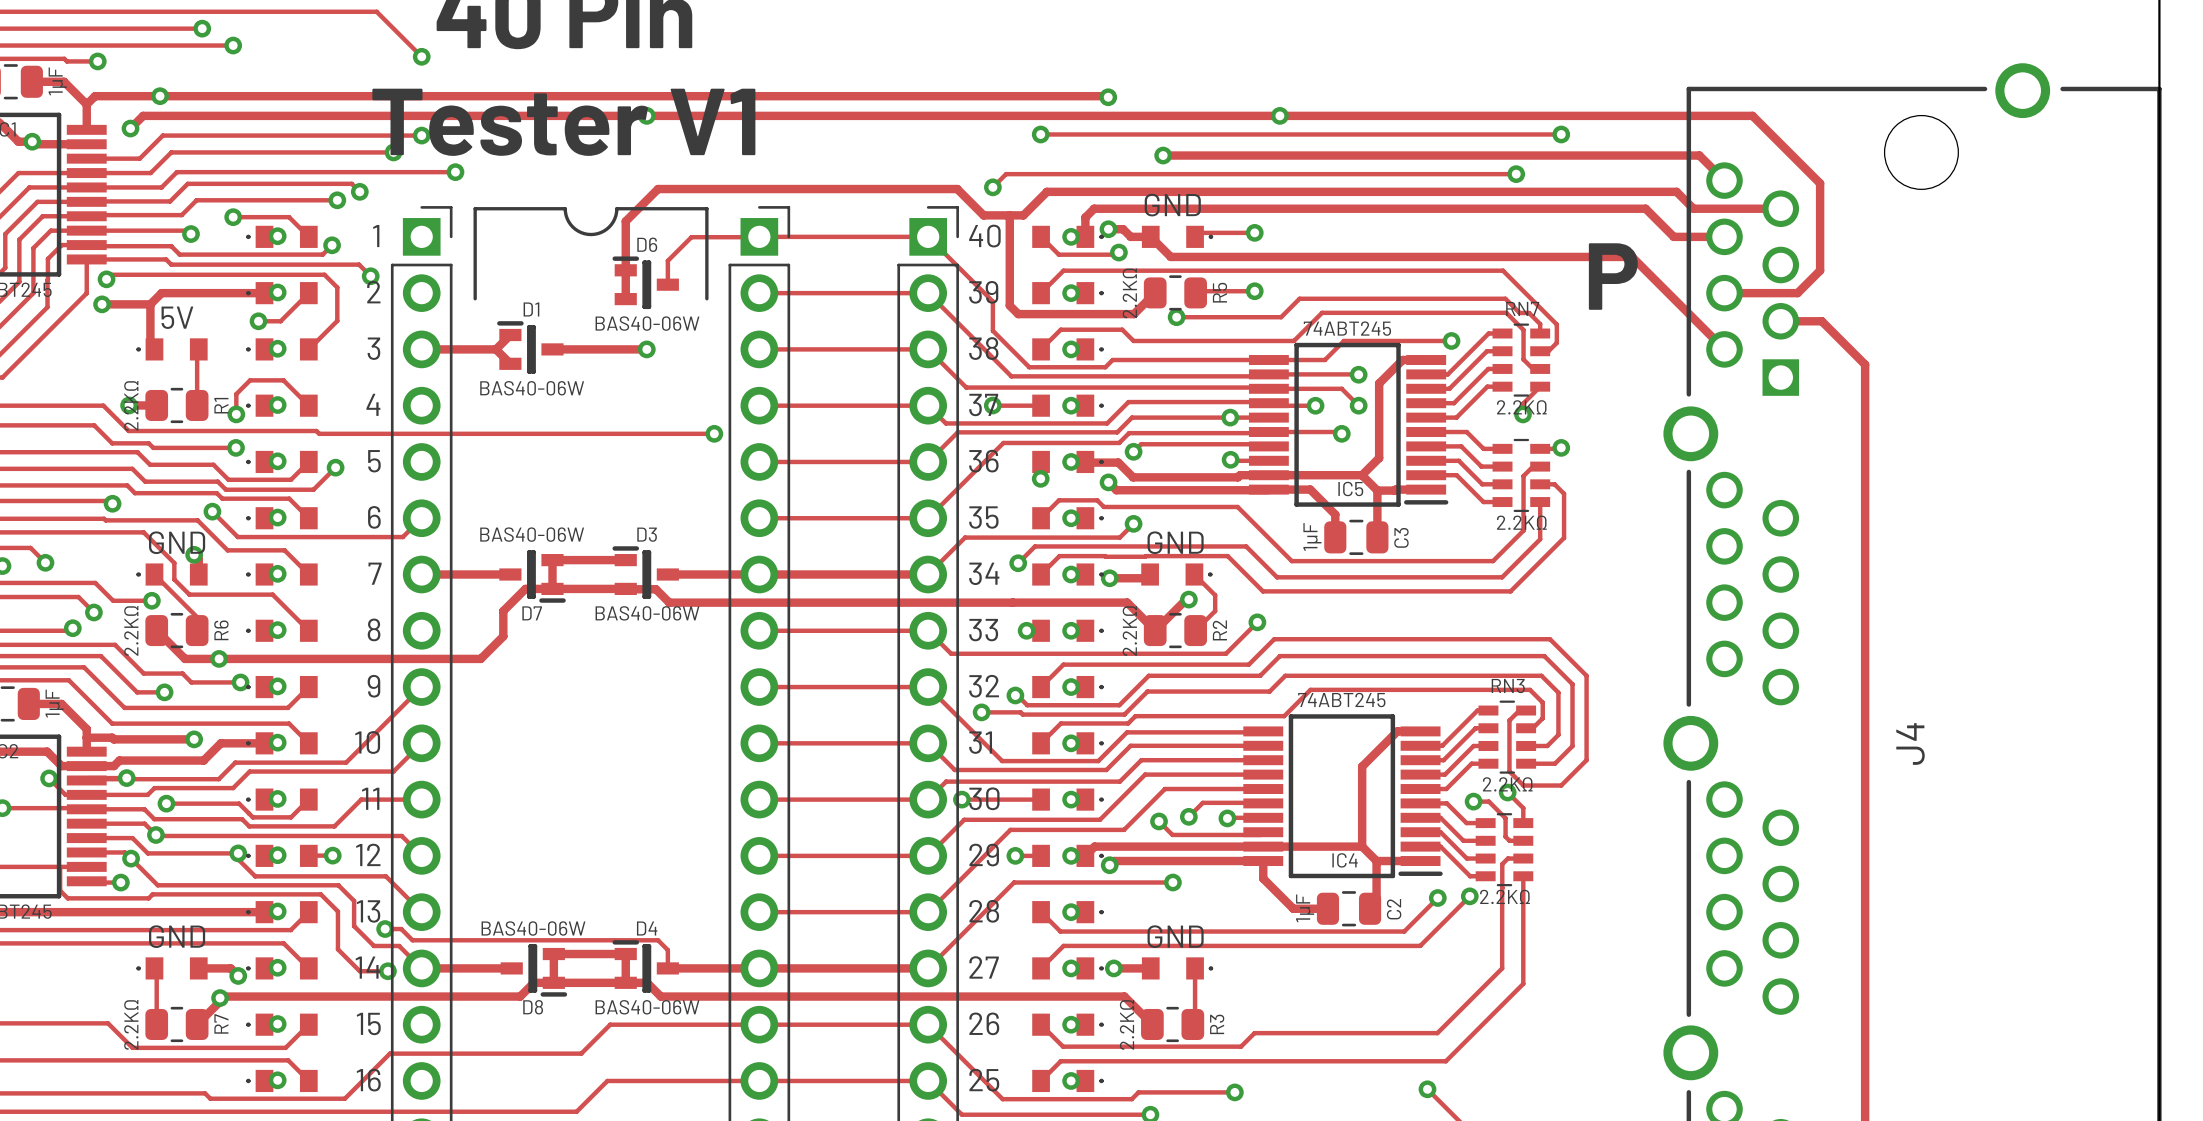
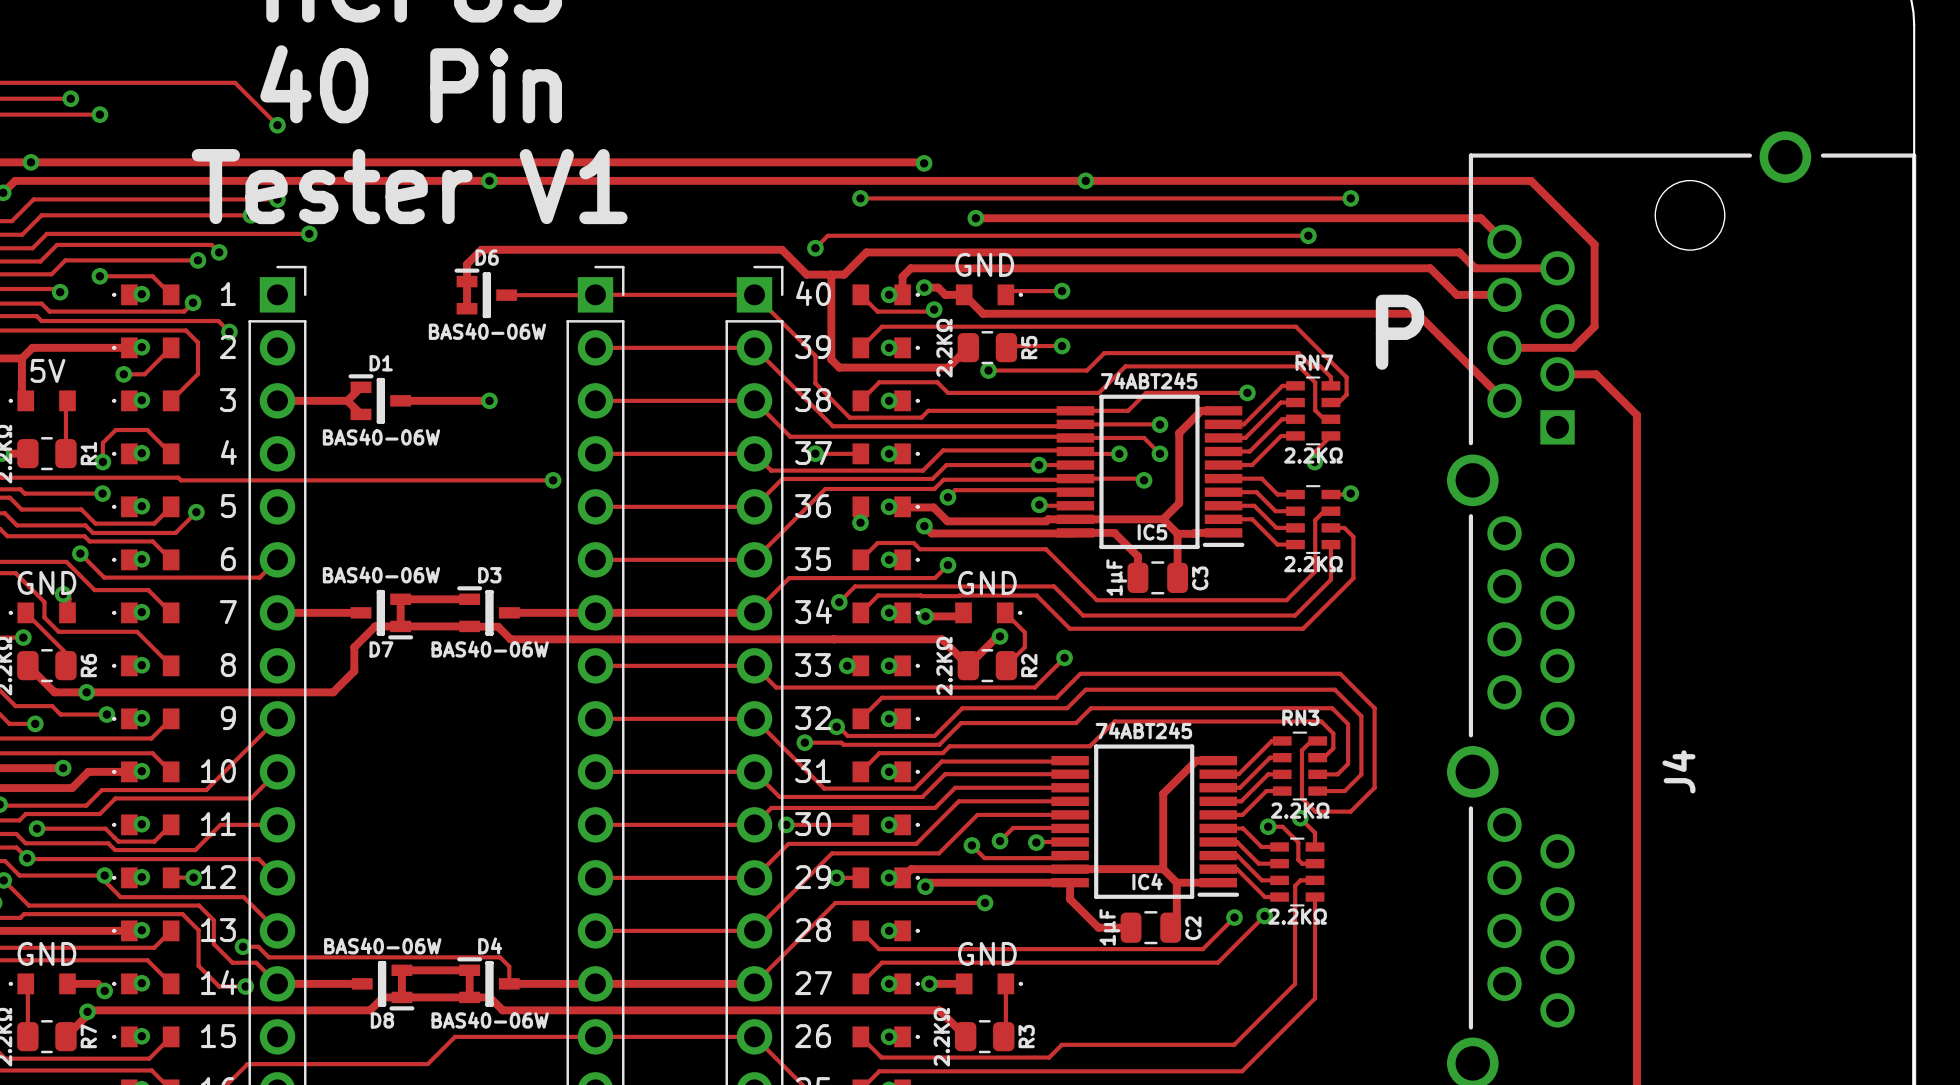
track: (658, 189) (625, 221) (625, 299) -> (500, 249) (481, 249) (467, 264) (467, 308)
track: (691, 237) (667, 260) (667, 284) -> (531, 295) (506, 295)
D6 position: (645, 282) -> (485, 293)
line: (475, 298) (475, 208) (565, 208) (567, 218) (572, 226) (581, 232) (591, 234) (600, 232) (609, 226) (614, 218) (616, 208) (706, 208) (706, 298) -> none

